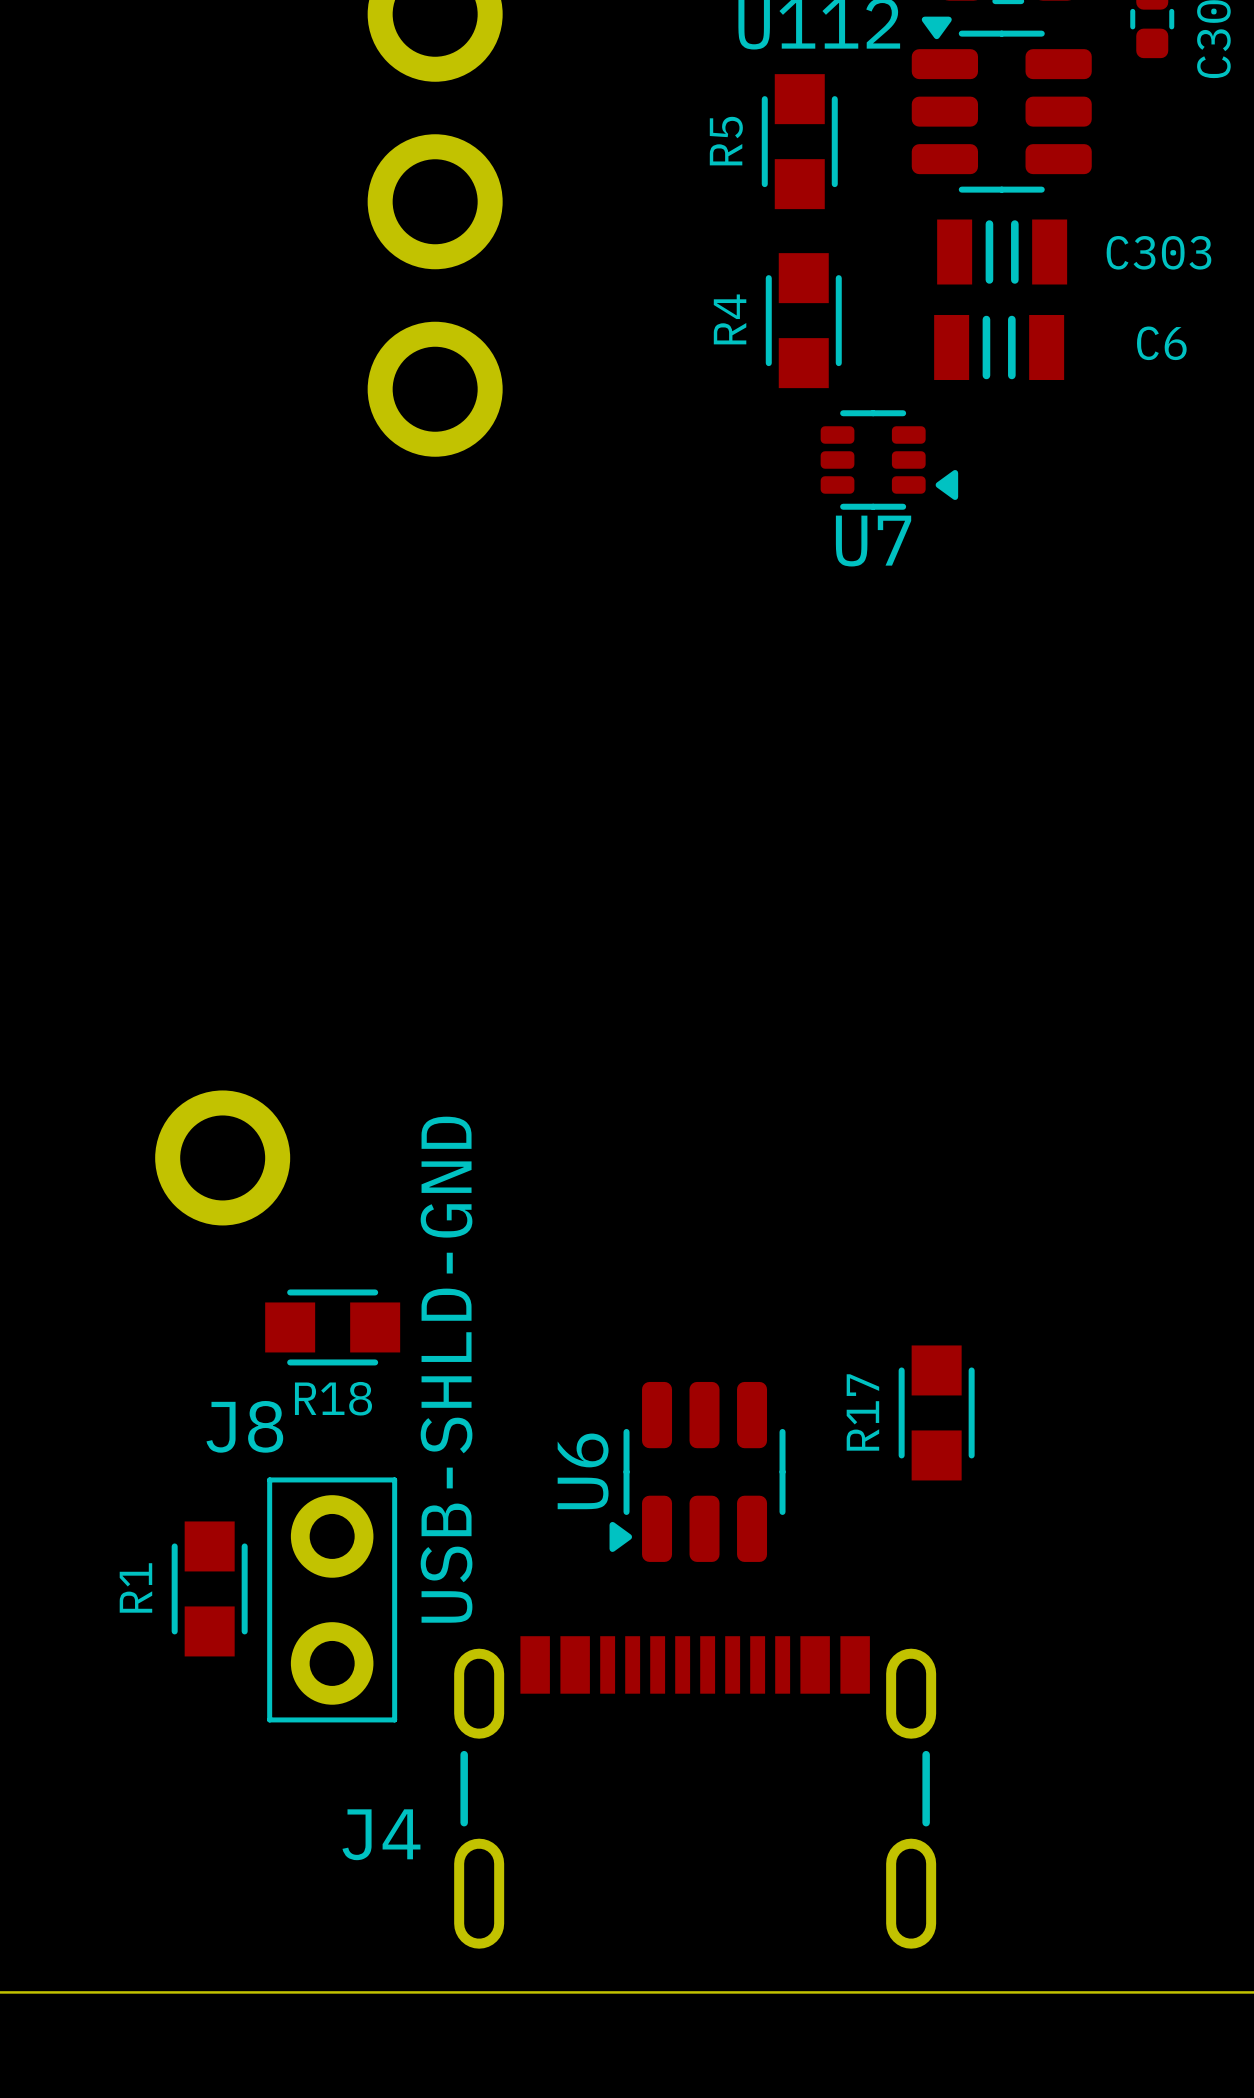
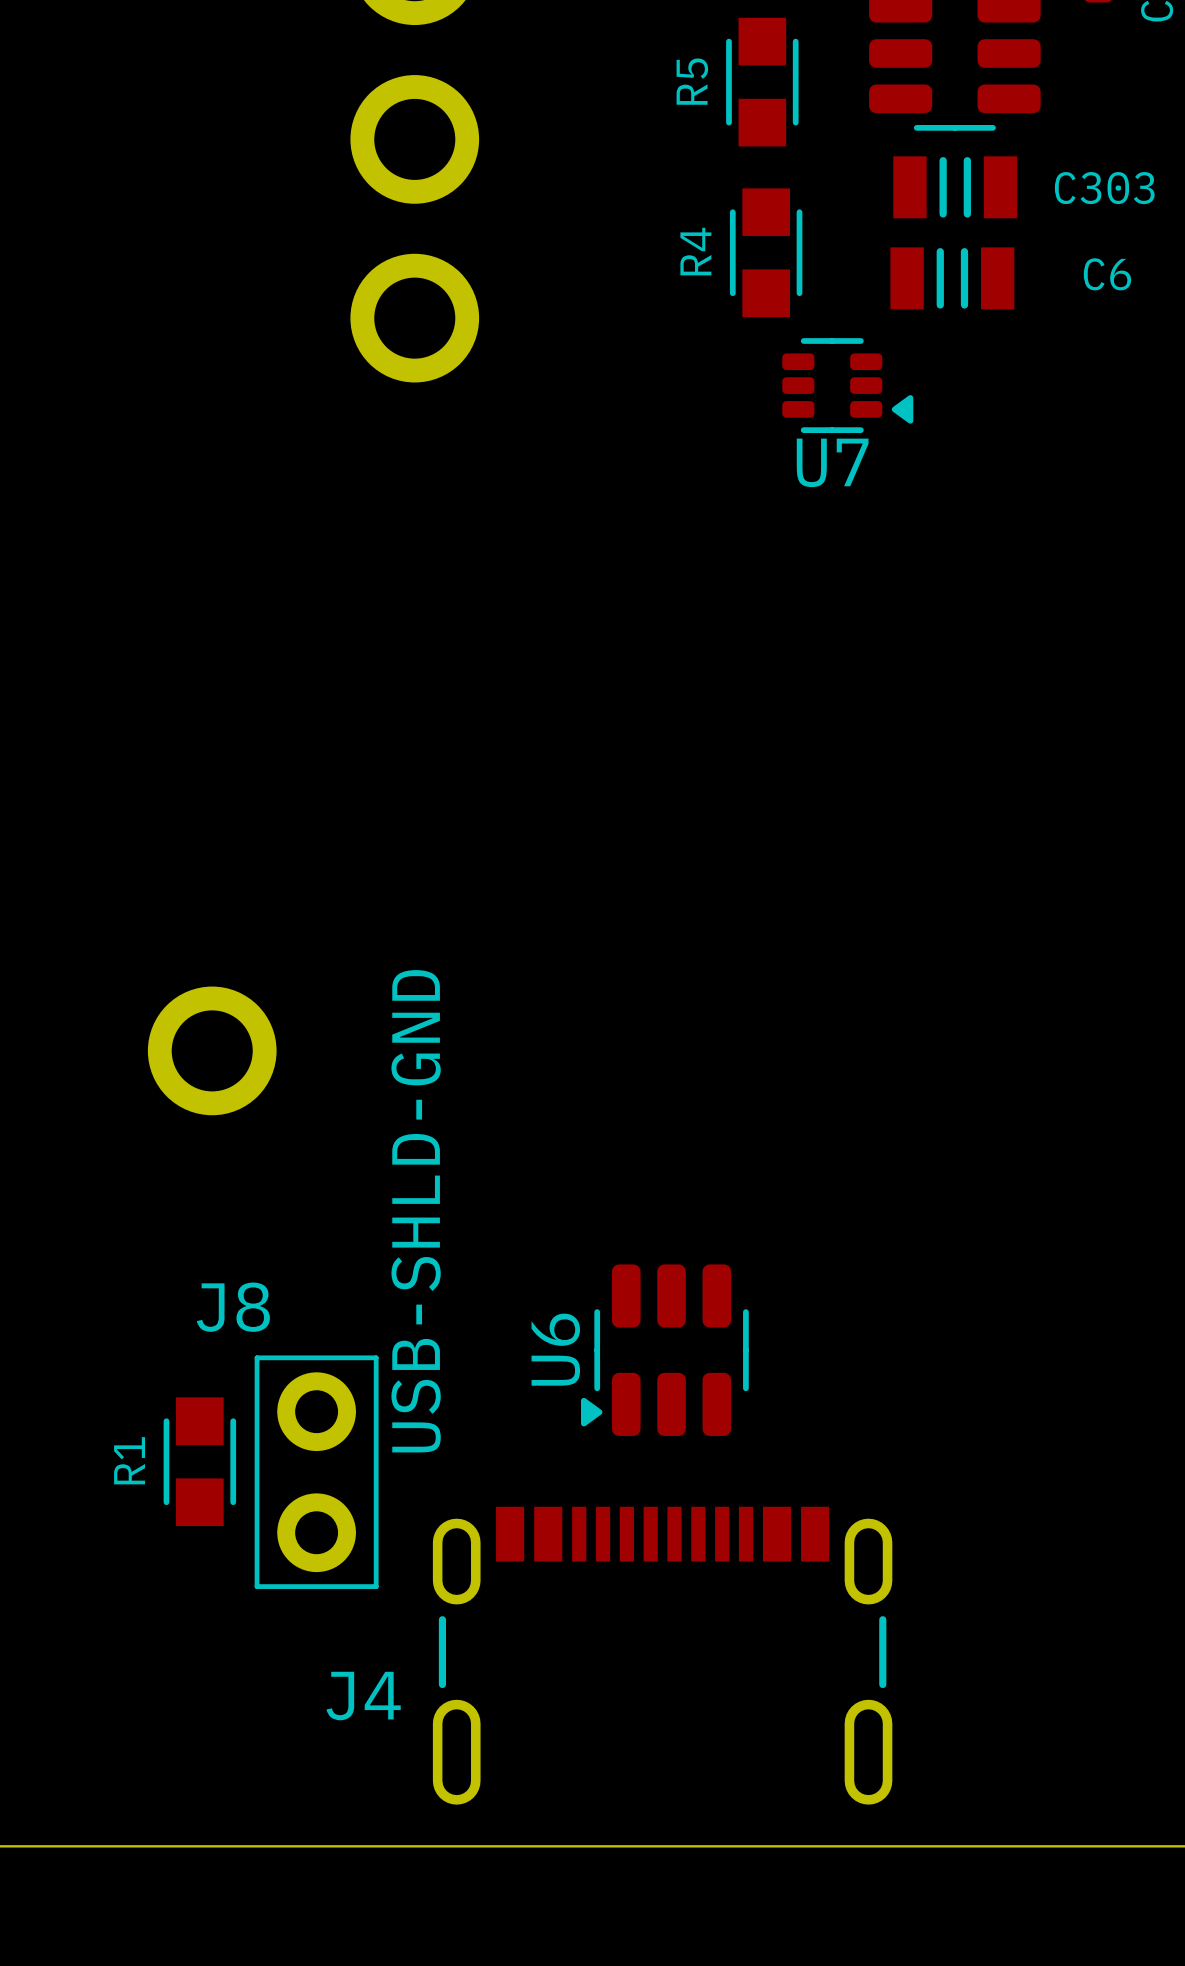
R18: (332, 1327) -> none
text position: USB-SHLD-GND (446, 1369) -> USB-SHLD-GND (416, 1211)
R17: (936, 1412) -> none

